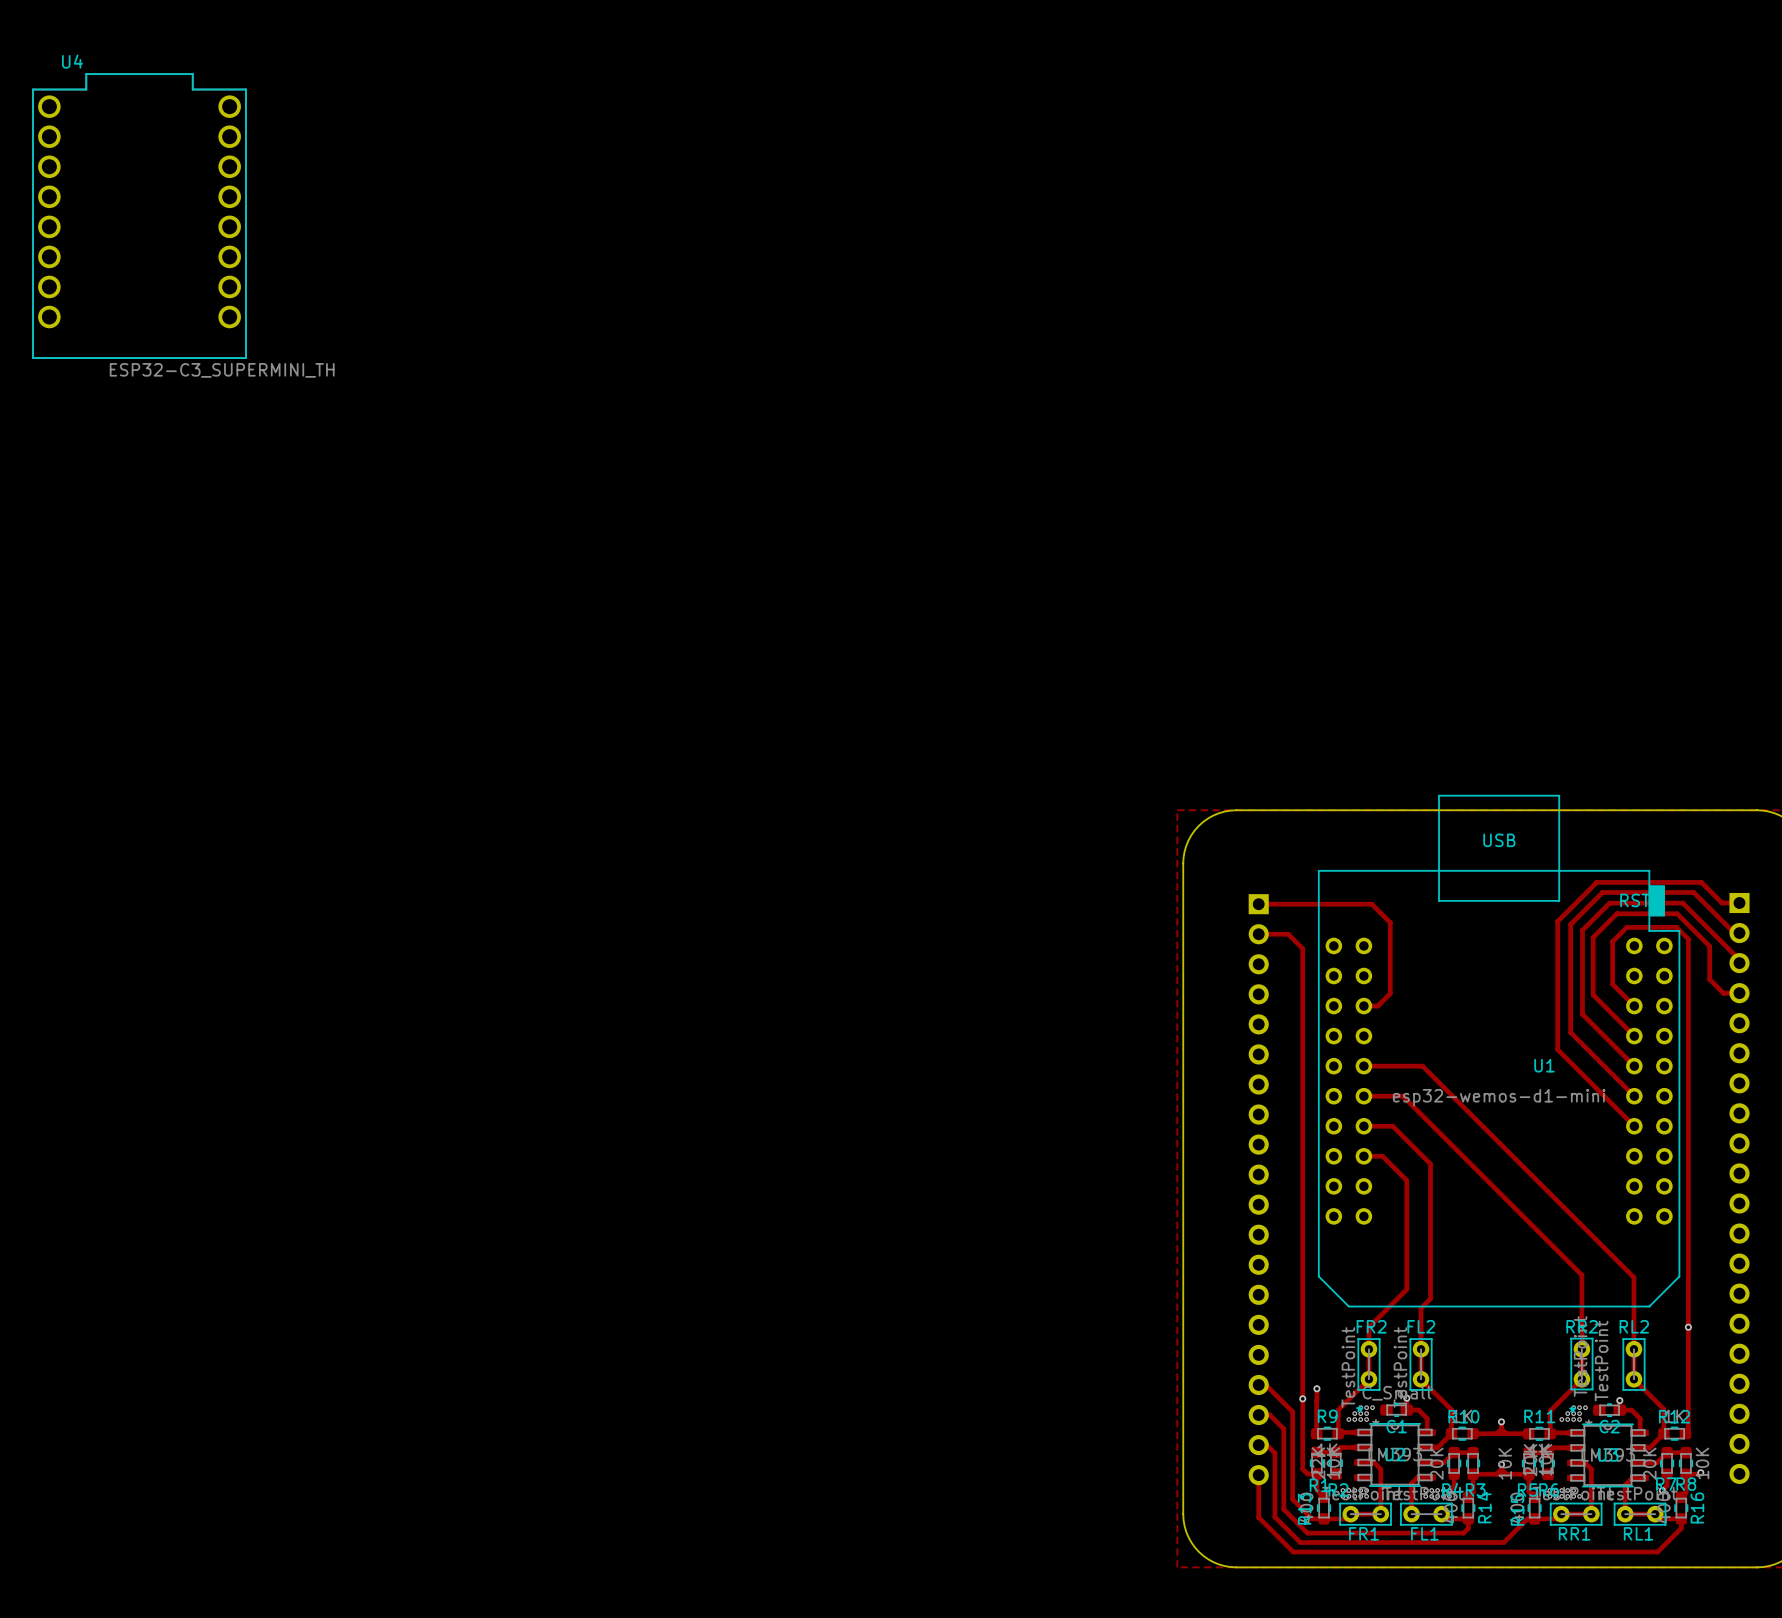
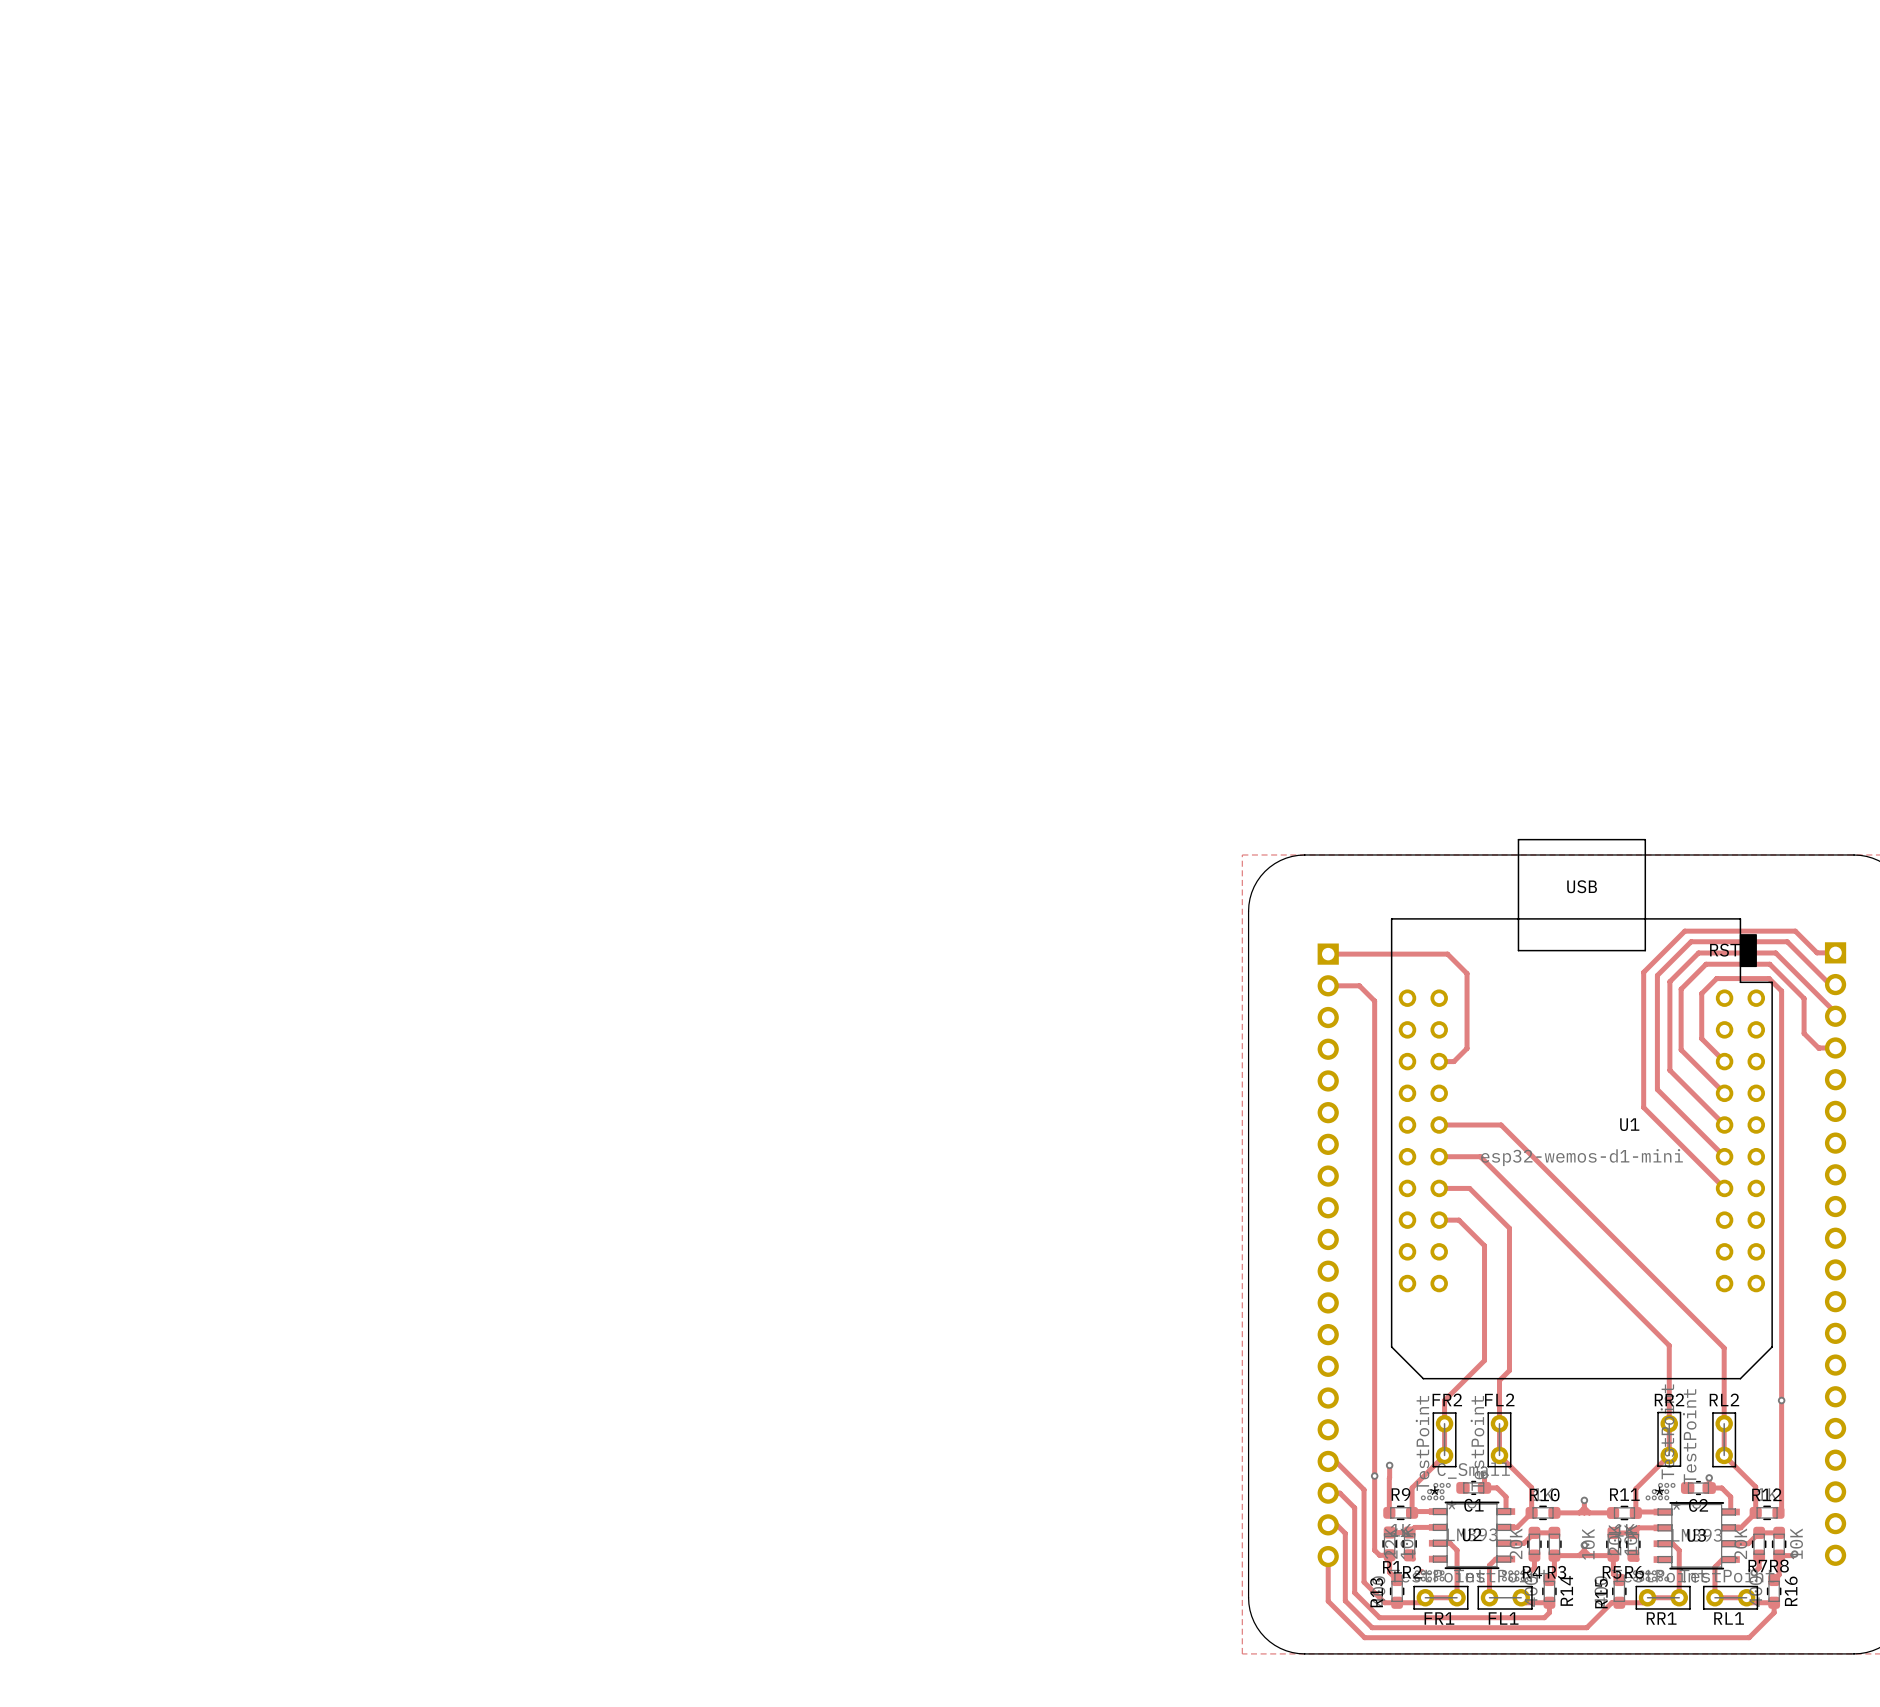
U4: ESP32-C3_SUPERMINI_TH (139, 216) -> none

